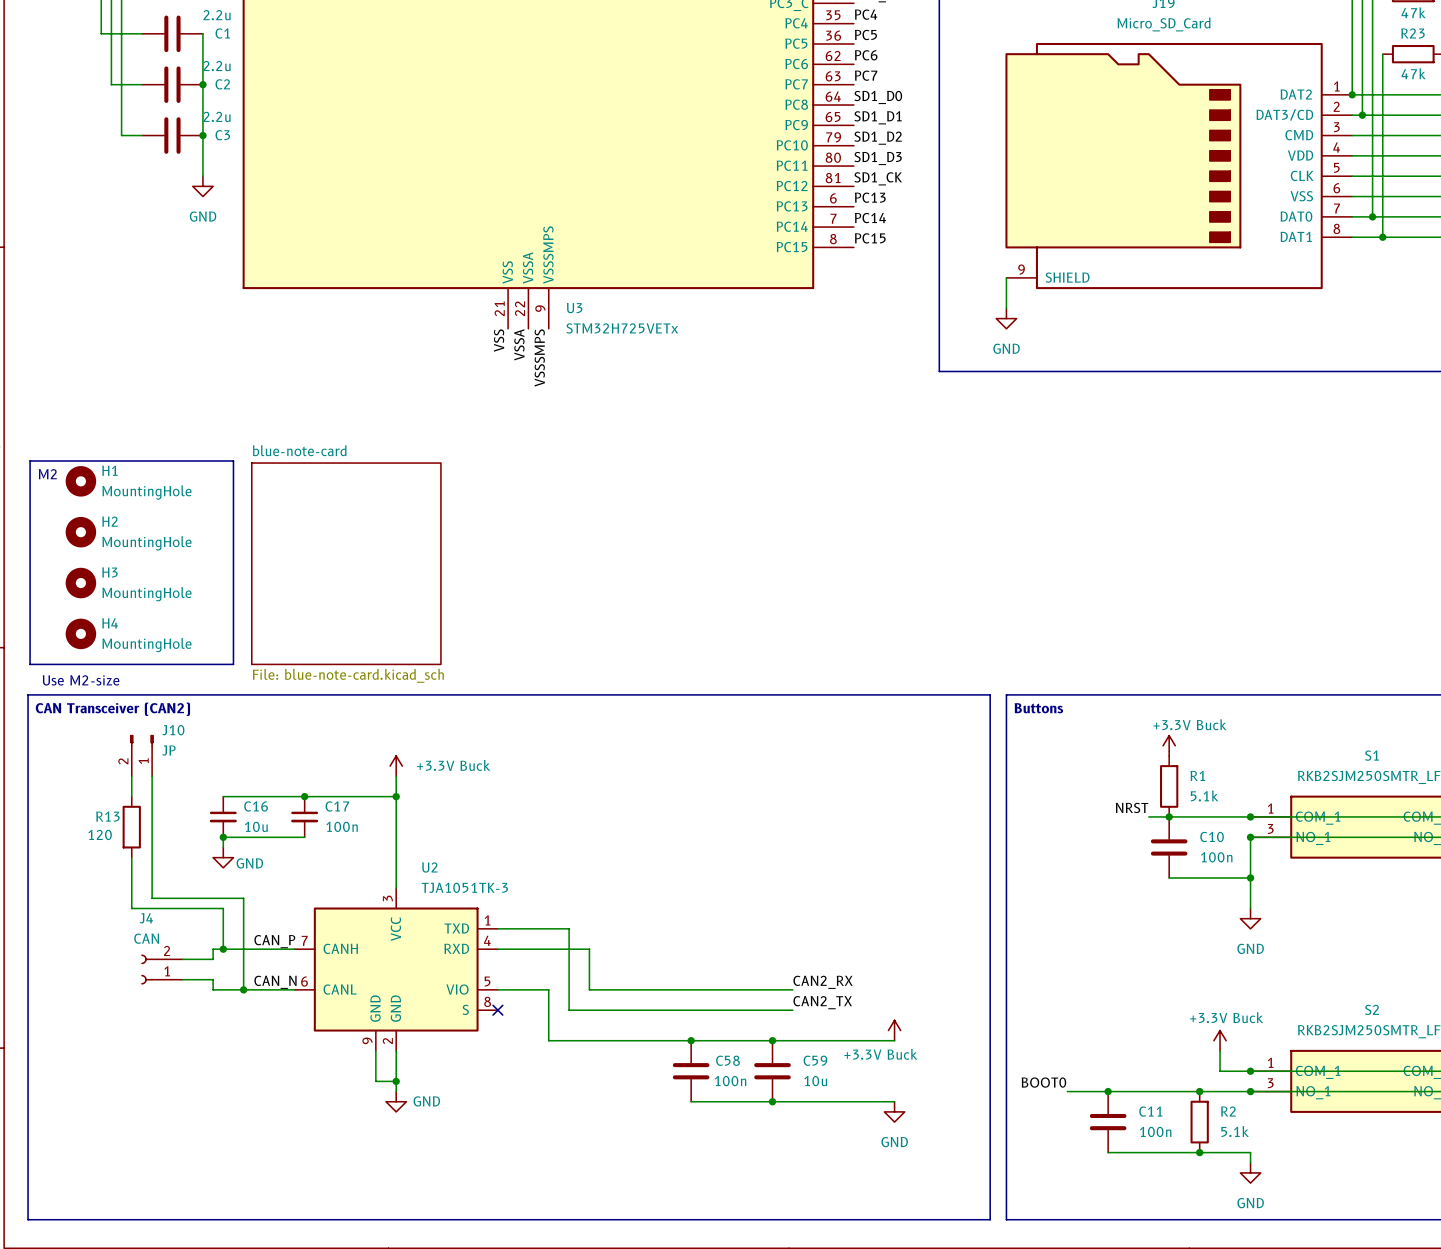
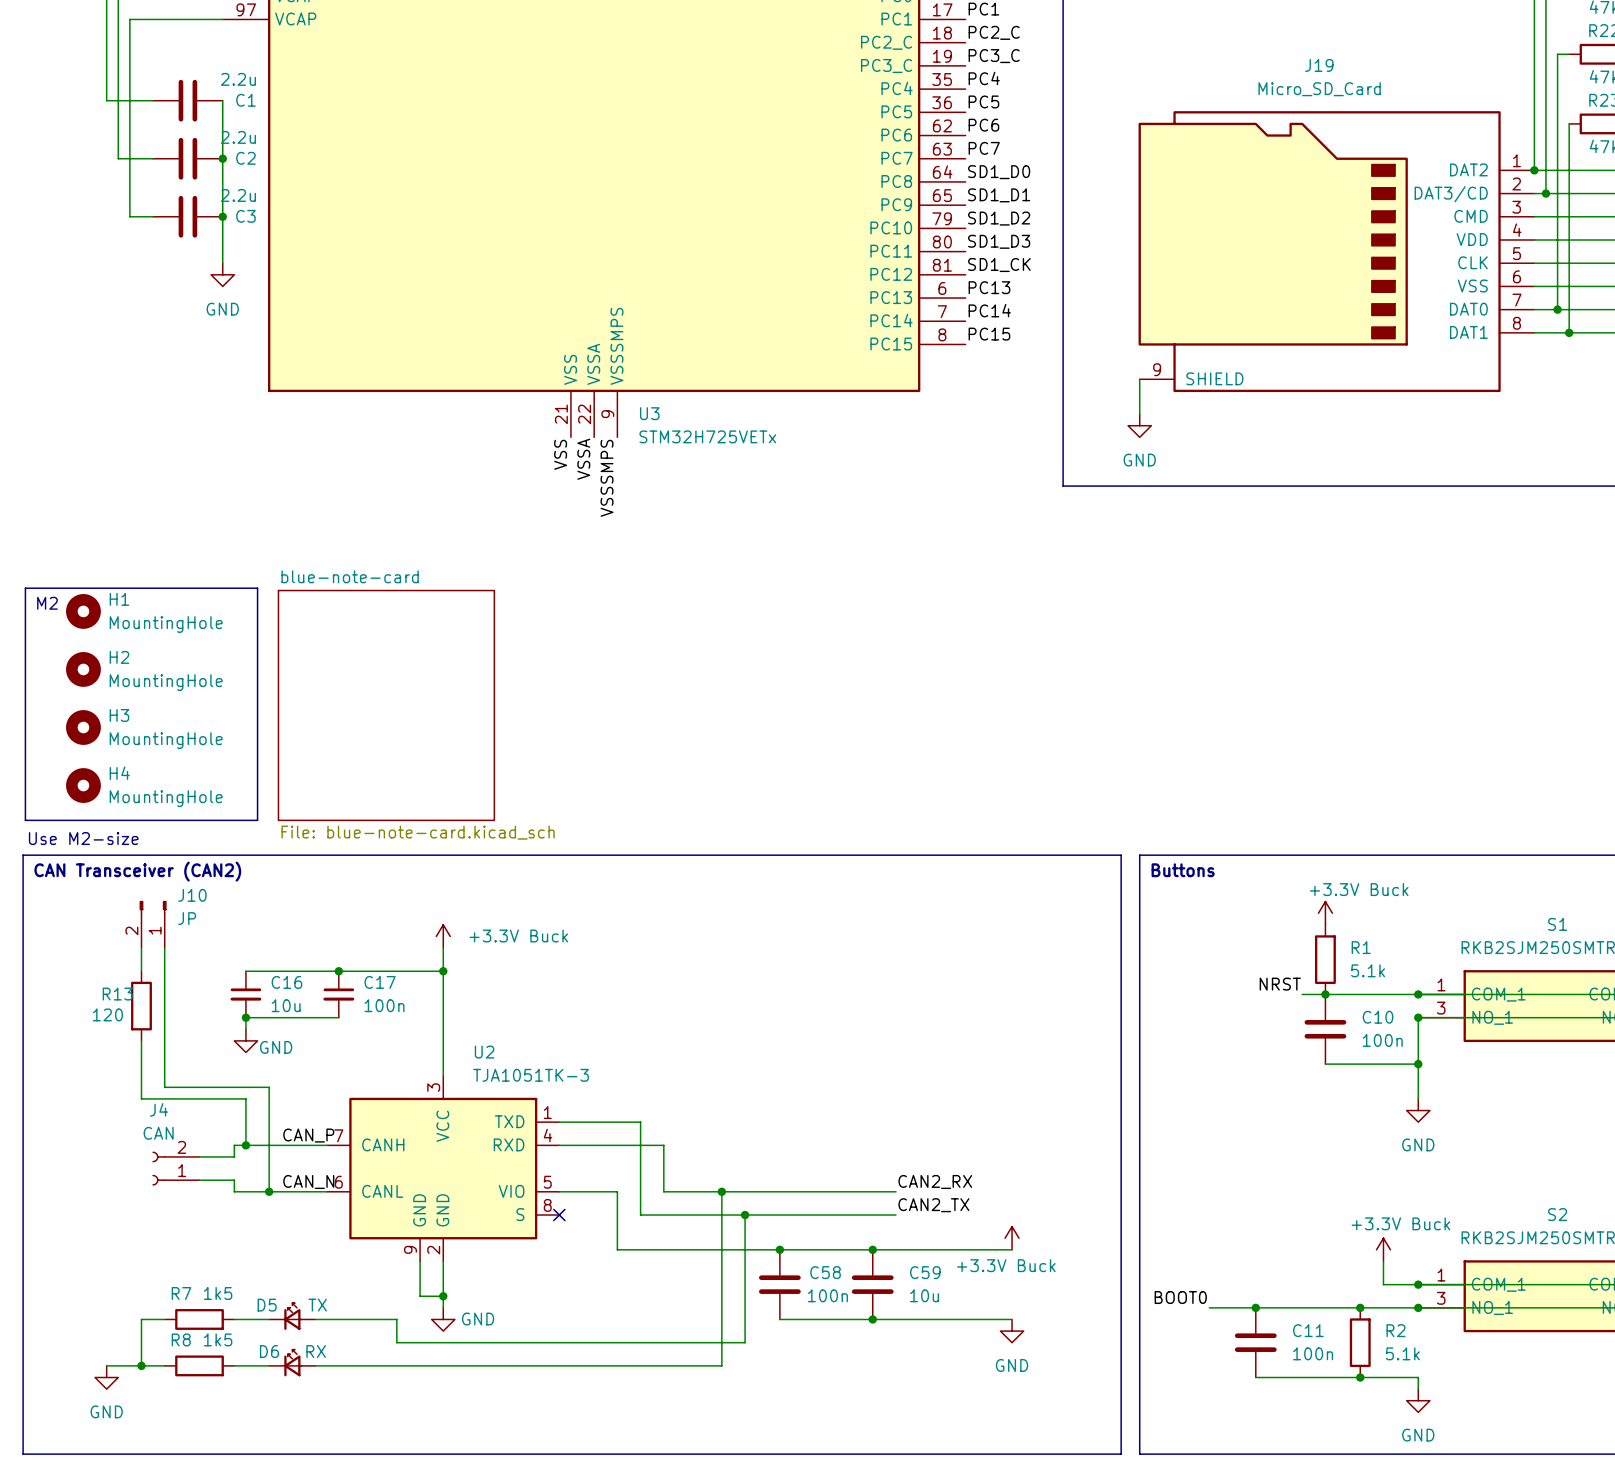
wire: none -> (721, 1191) (721, 1365) (315, 1365)
junction: none -> (721, 1191)
wire: none -> (745, 1215) (745, 1342) (396, 1342) (396, 1319) (315, 1319)
junction: none -> (745, 1215)
D5: none -> TX (292, 1316)
wire: none -> (164, 1319) (141, 1319) (141, 1365)
R7: none -> 1k5 (199, 1319)
wire: none -> (234, 1319) (269, 1319)
D6: none -> RX (292, 1363)
wire: none -> (106, 1365) (164, 1365)
junction: none -> (141, 1365)
R8: none -> 1k5 (199, 1365)
wire: none -> (234, 1365) (269, 1365)
power symbol: none -> GND (106, 1377)

